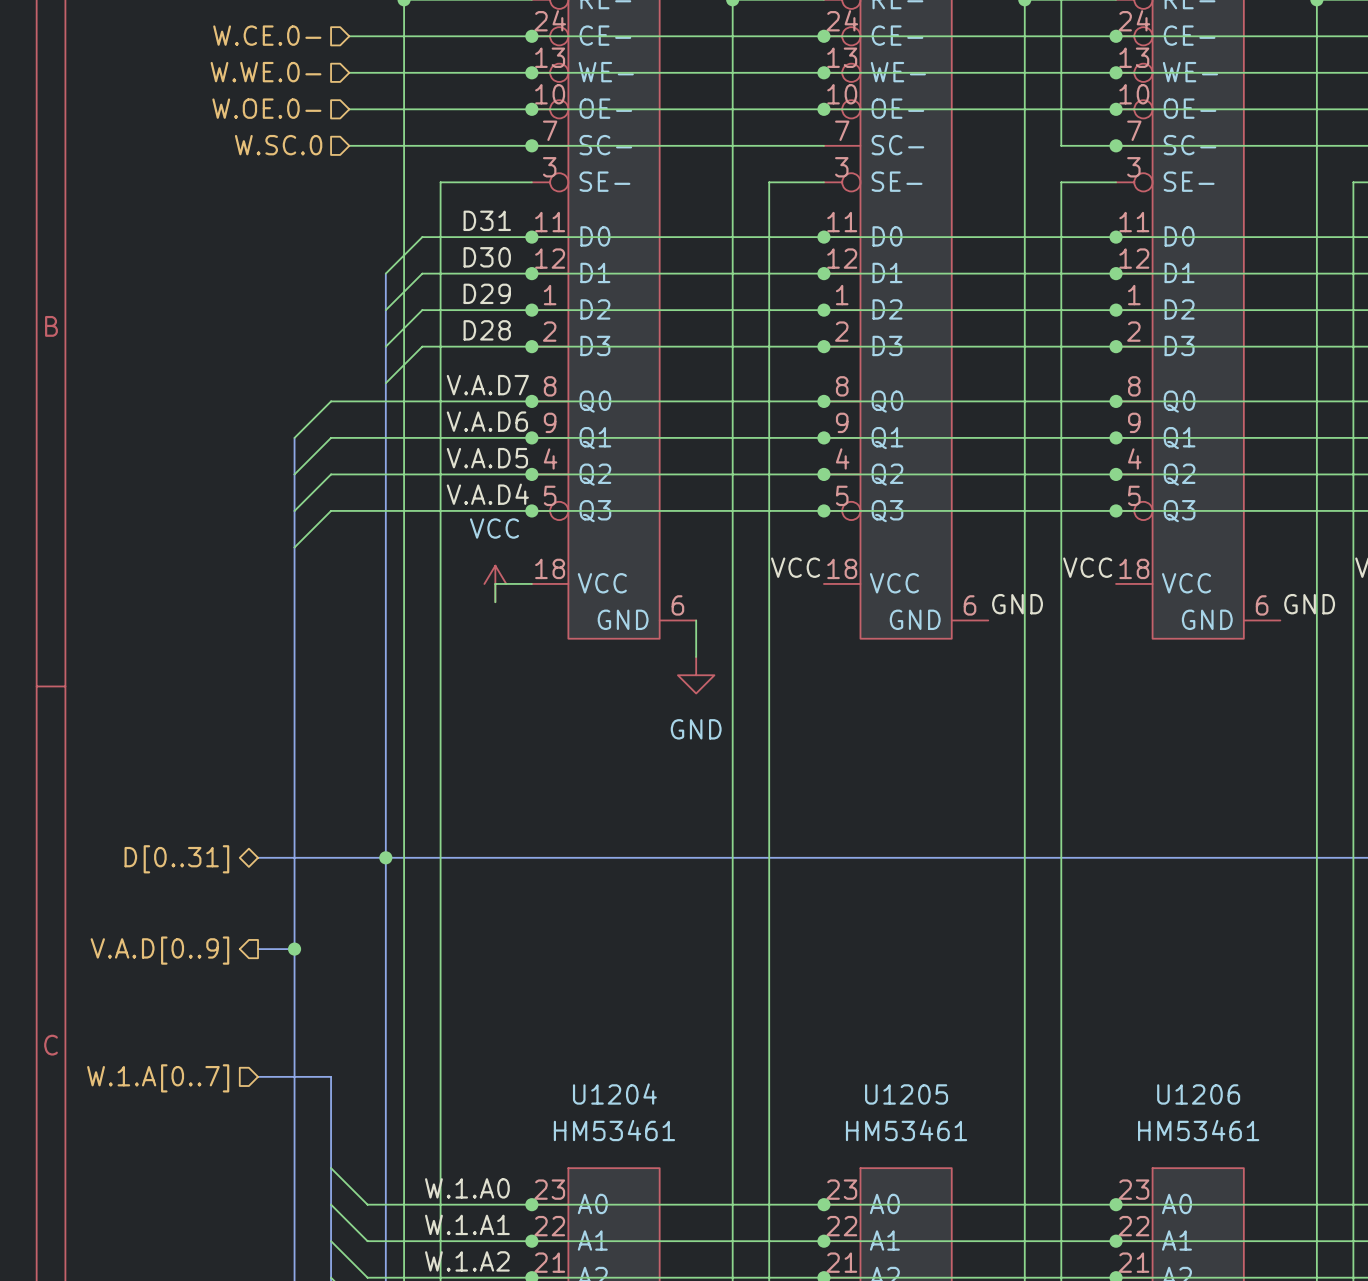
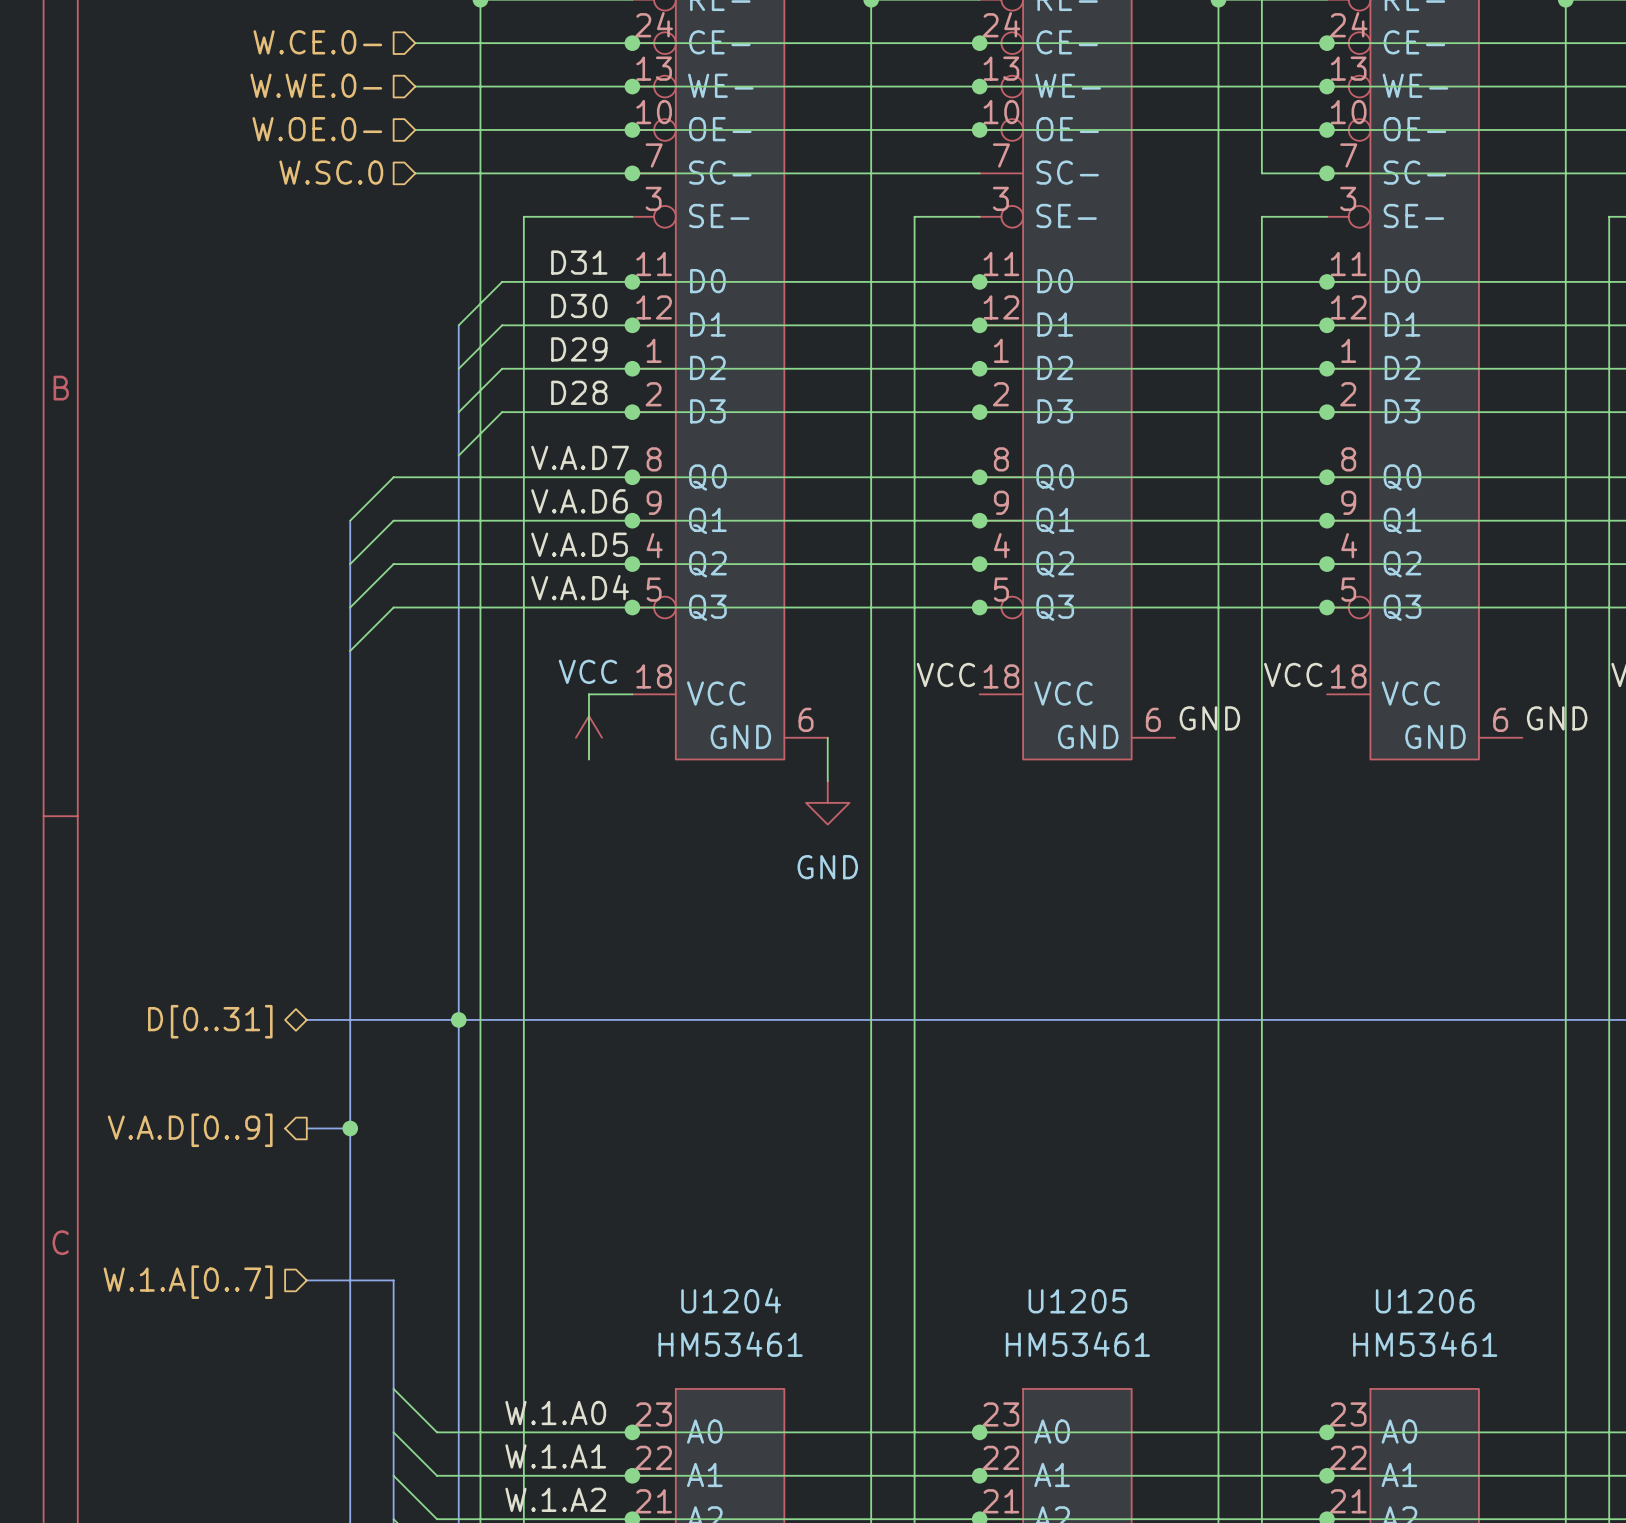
power symbol position: VCC (495, 583) -> VCC (588, 737)
wire: none -> (588, 716) (588, 759)

